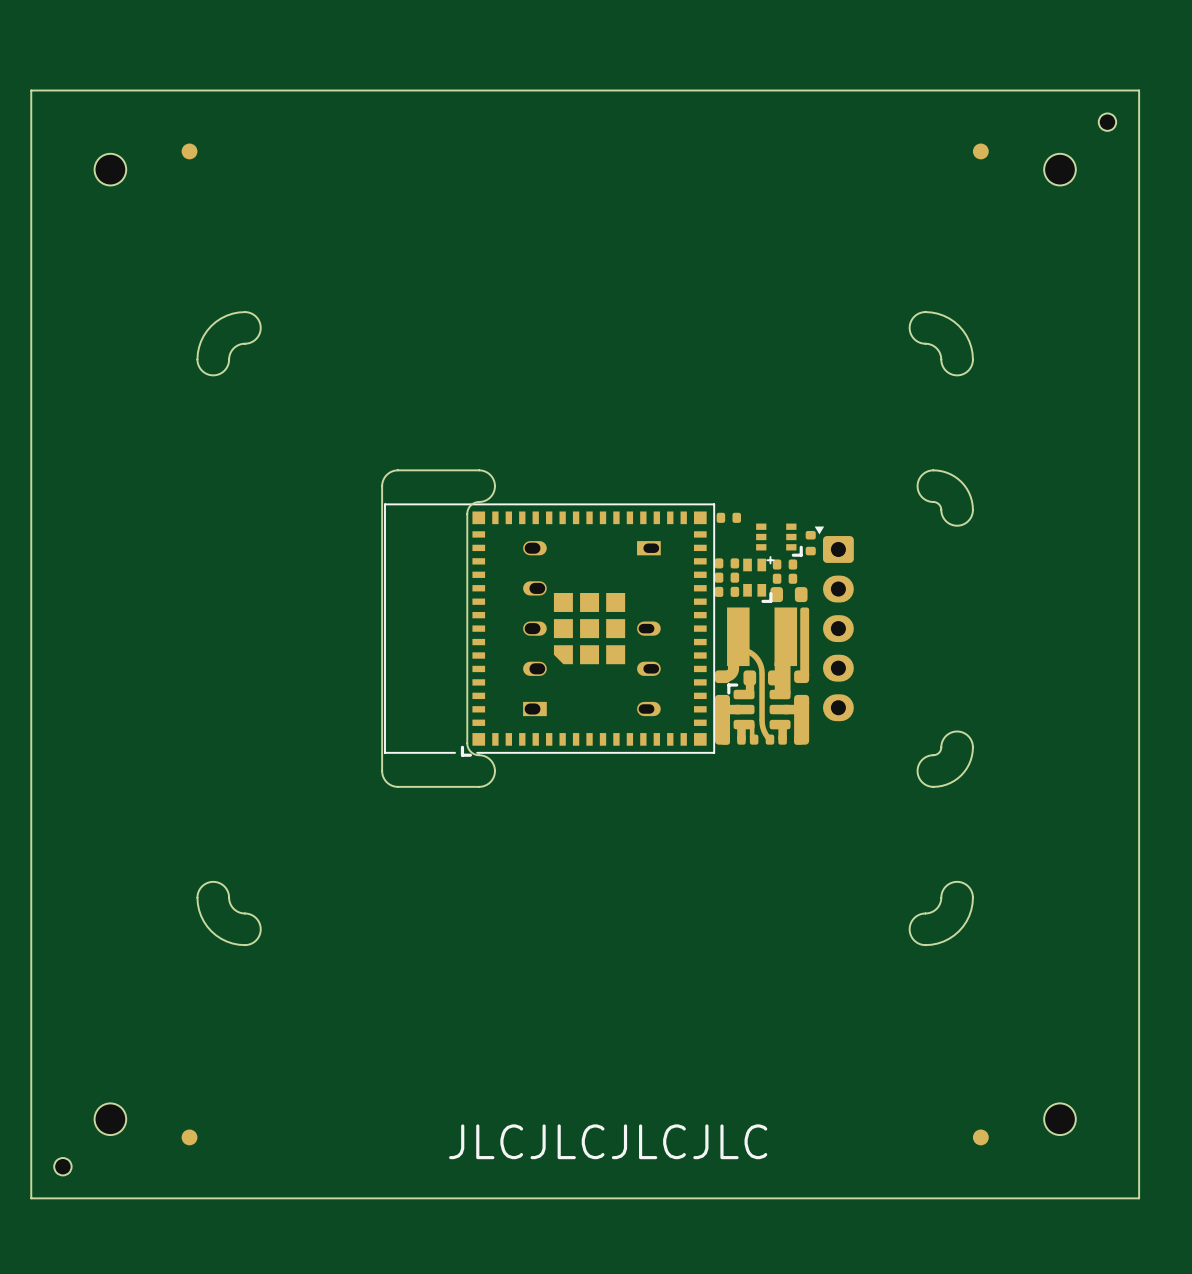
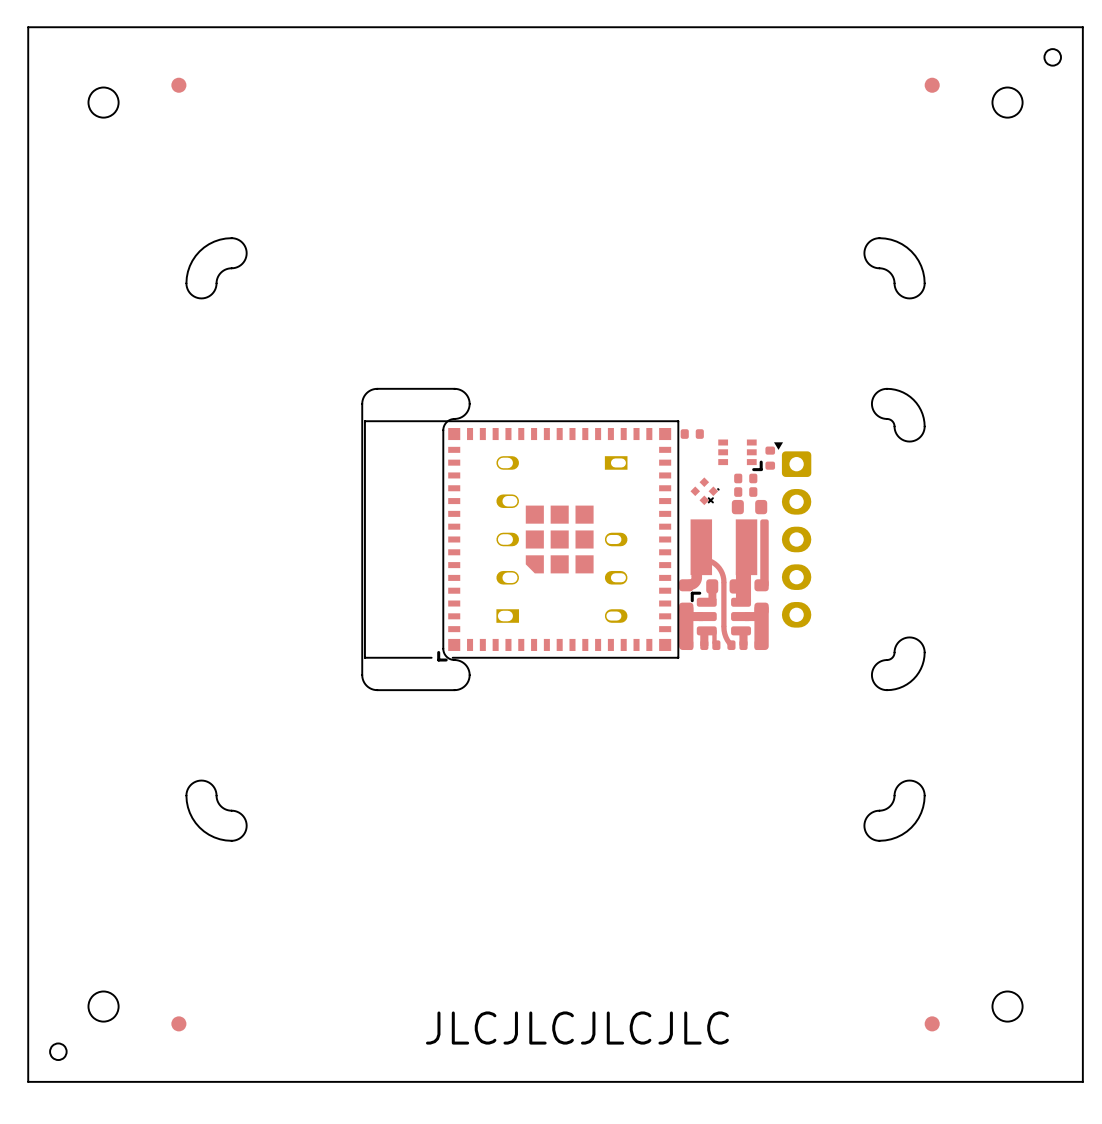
part: (726, 563) -> none
part: (726, 577) -> none
part: none -> (704, 491)
part: (758, 579) -> none
part: (726, 591) -> none

